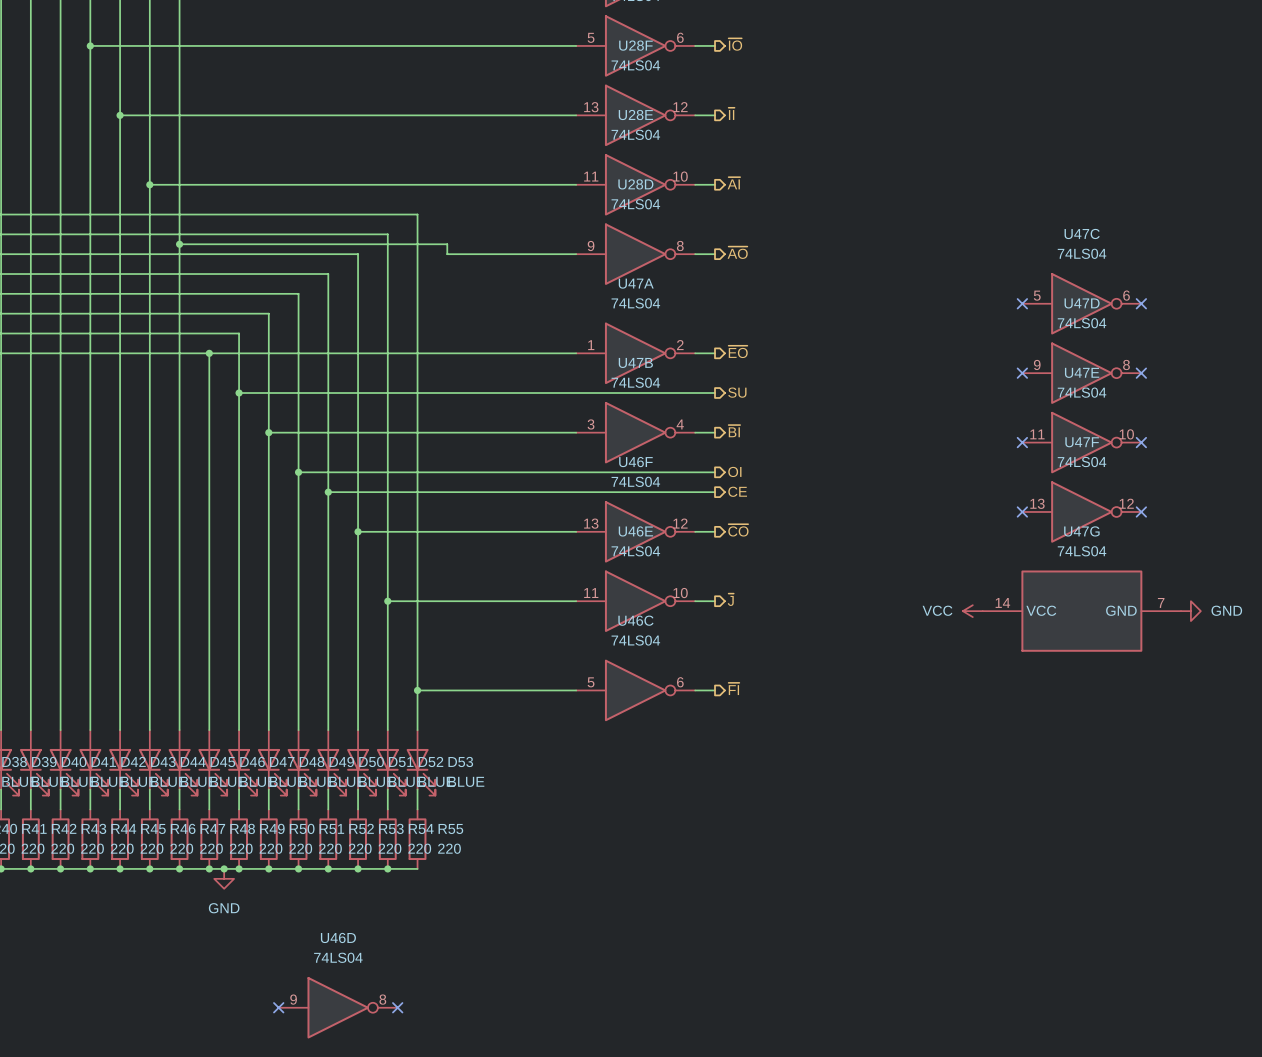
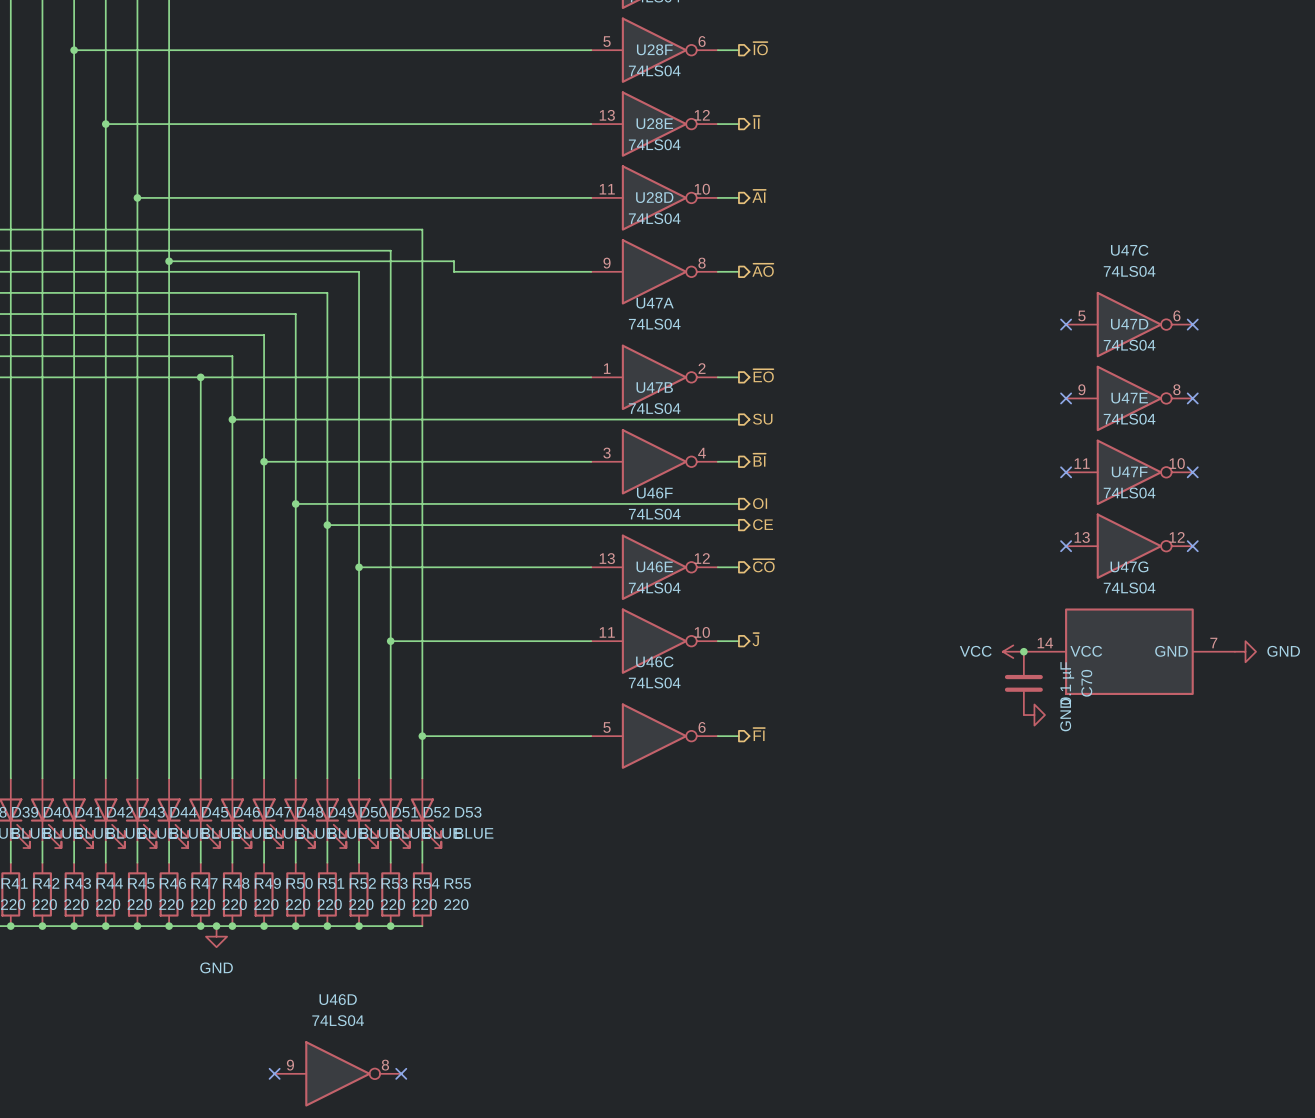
junction: none -> (1023, 651)
C70: none -> 0.1 µF (1023, 683)
power symbol: none -> GND (1034, 715)

